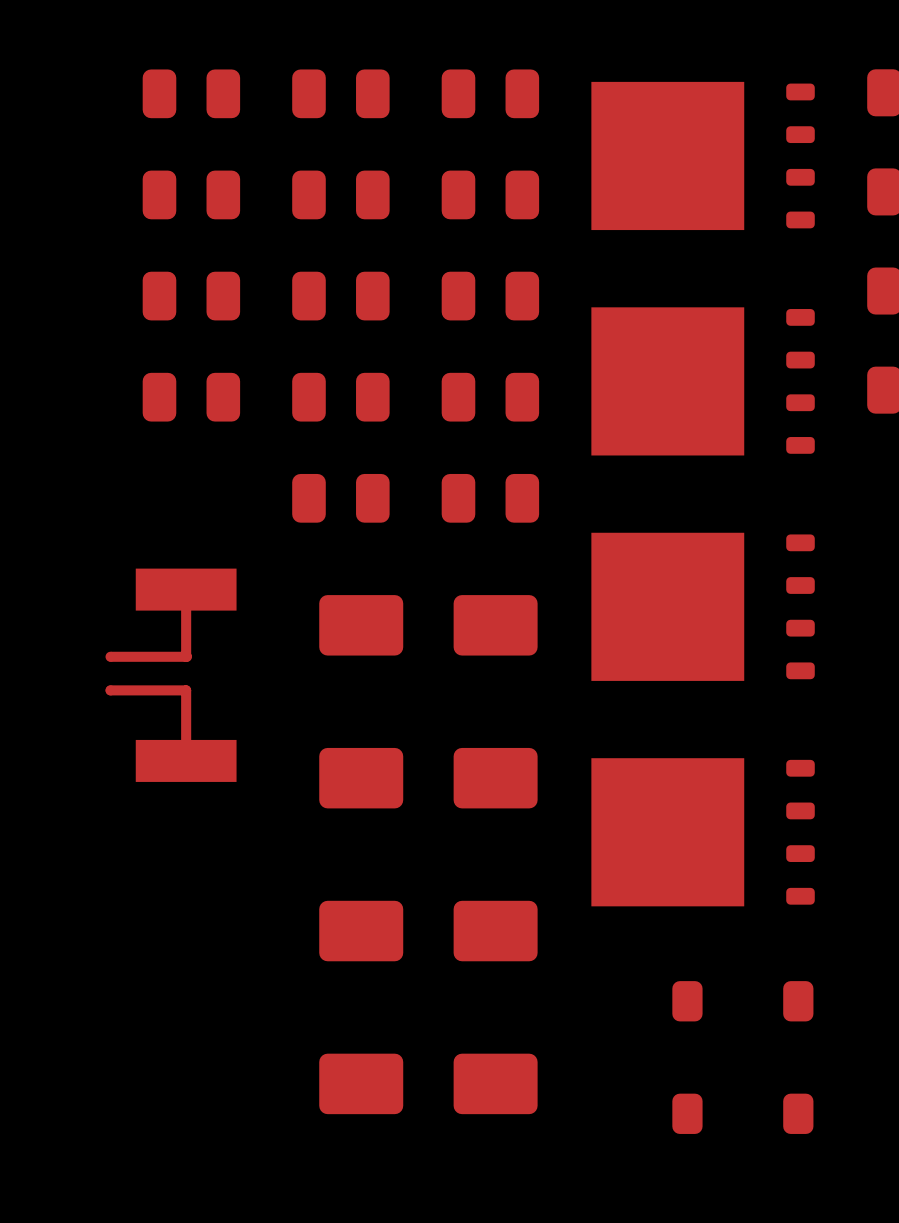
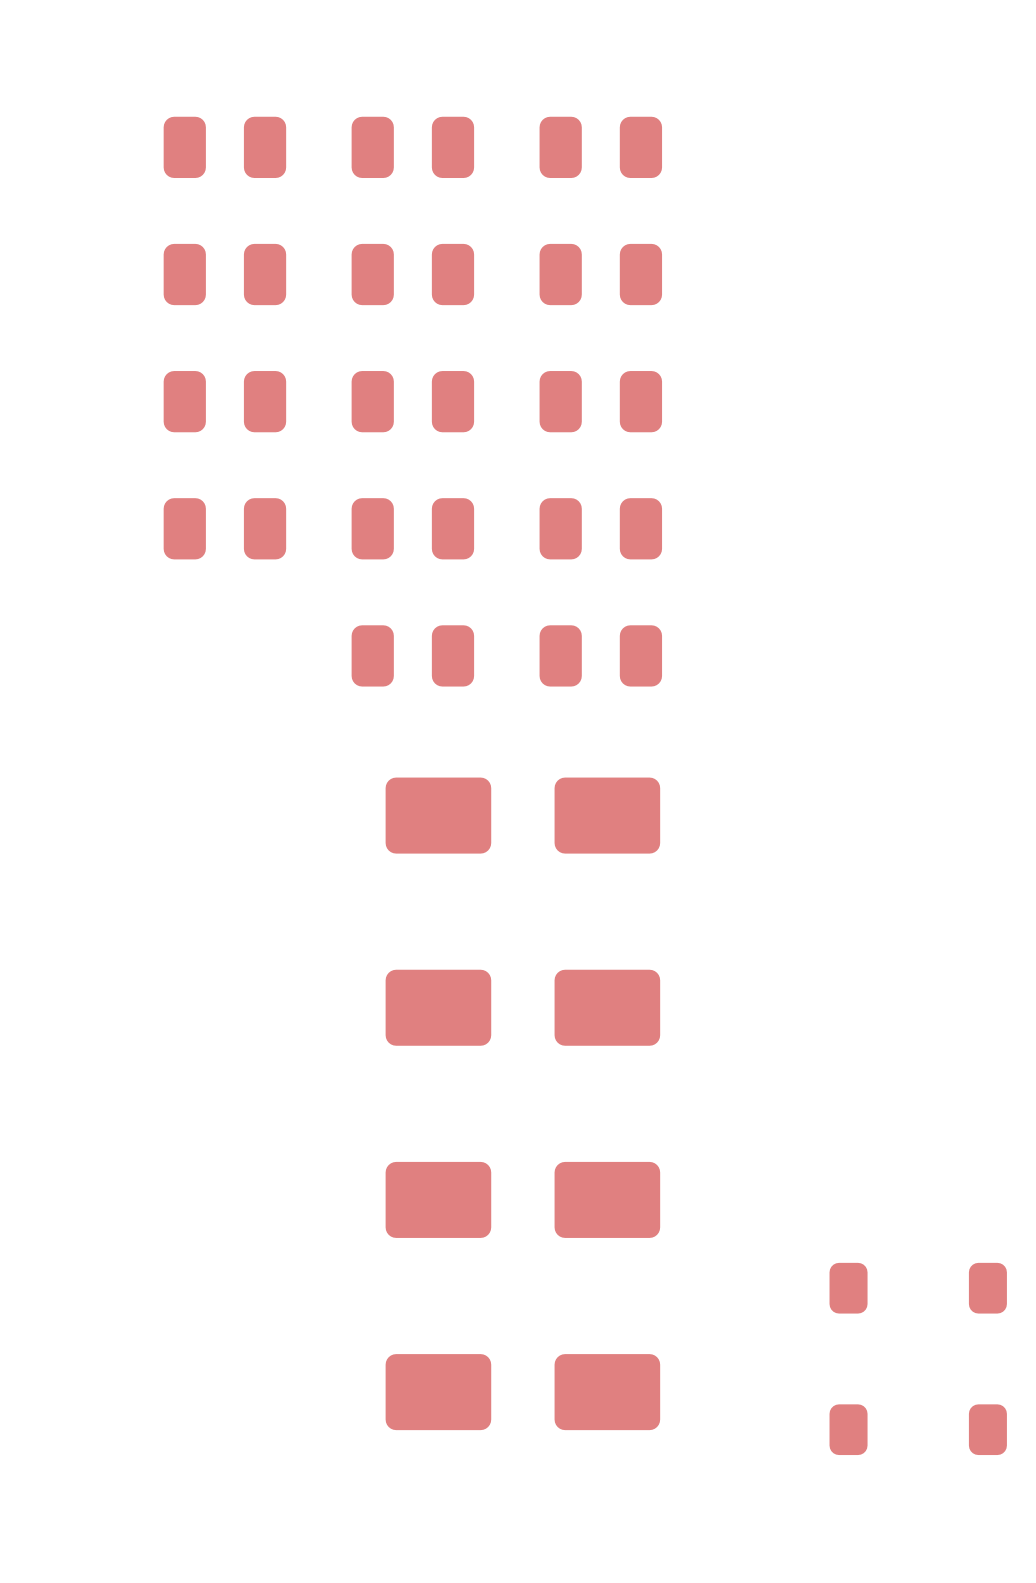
part: (703, 155) -> none
part: (703, 381) -> none
part: (703, 606) -> none
part: (171, 675) -> none
part: (703, 832) -> none

